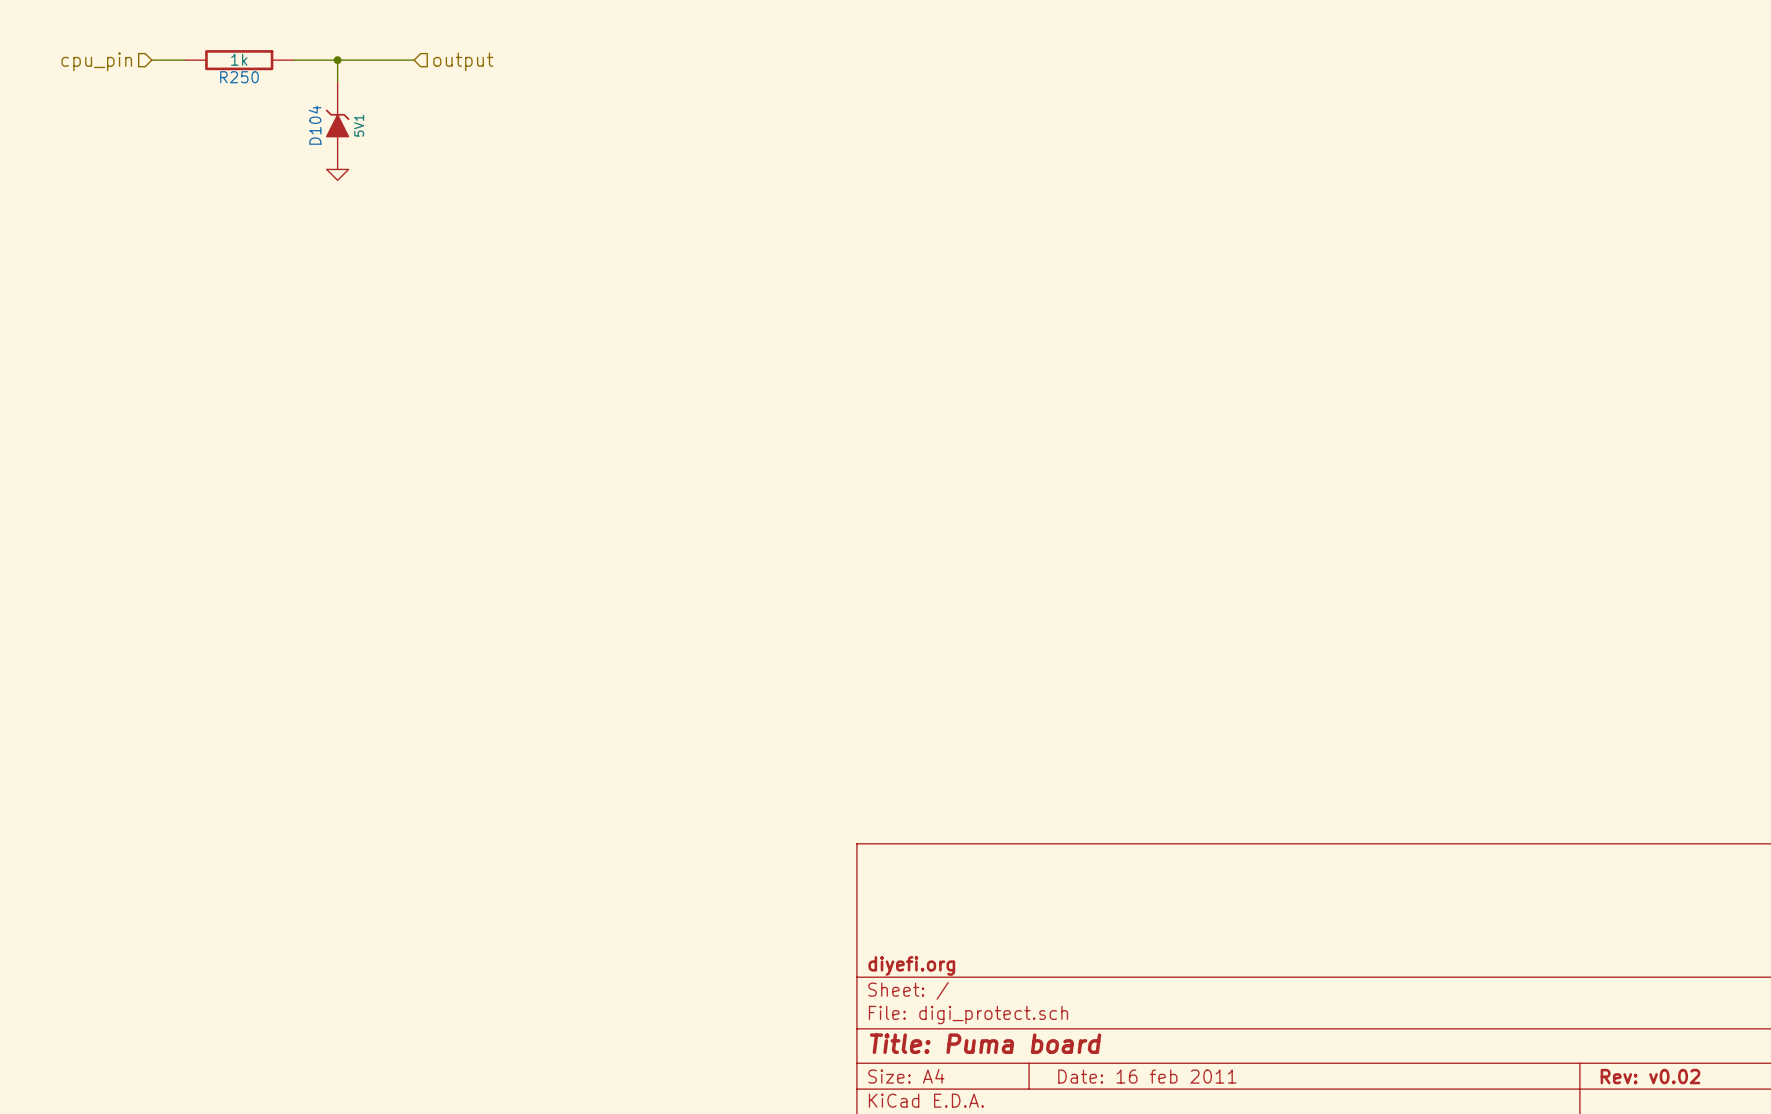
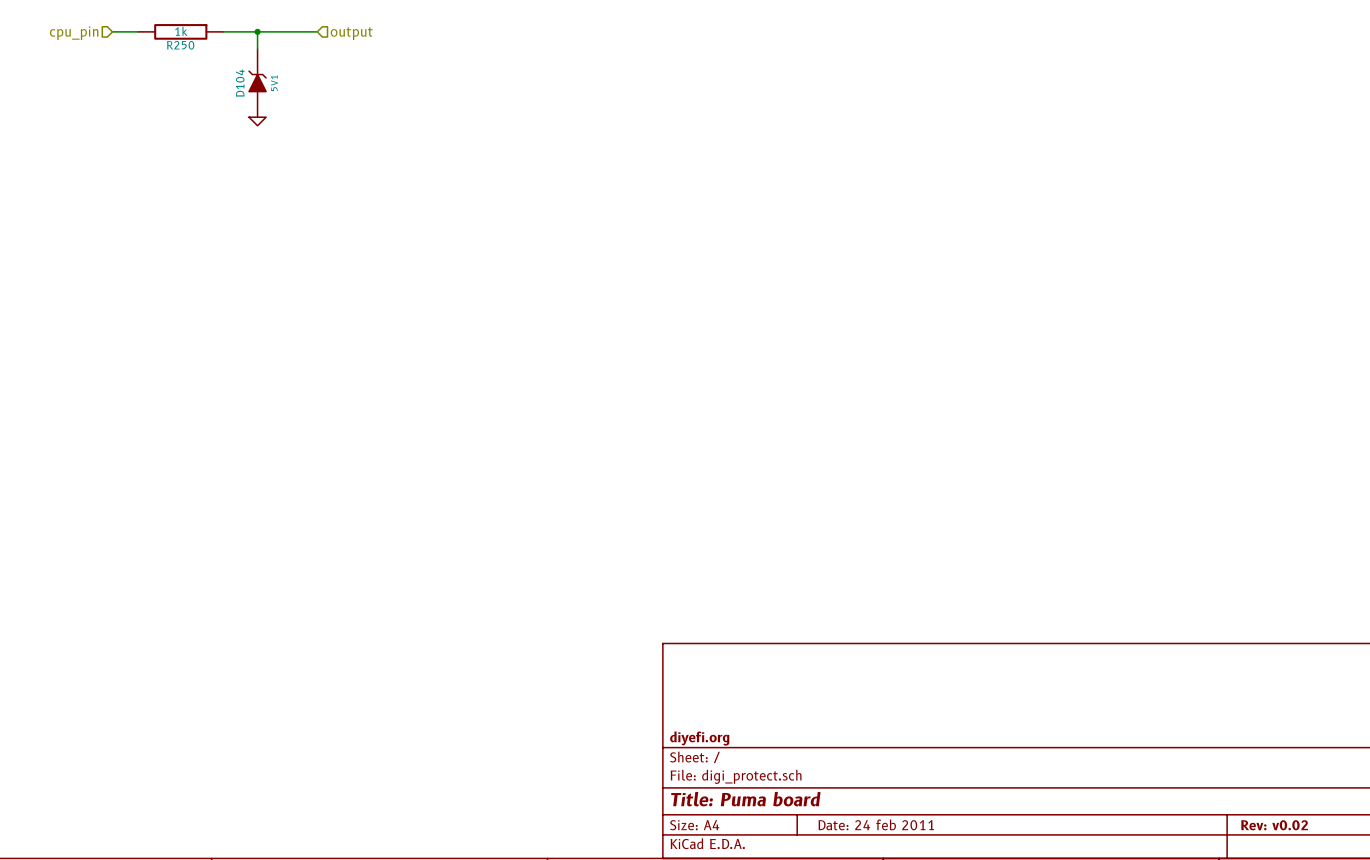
title block: Date: 16 feb 2011 (1147, 1076) -> Date: 24 feb 2011 (876, 824)

